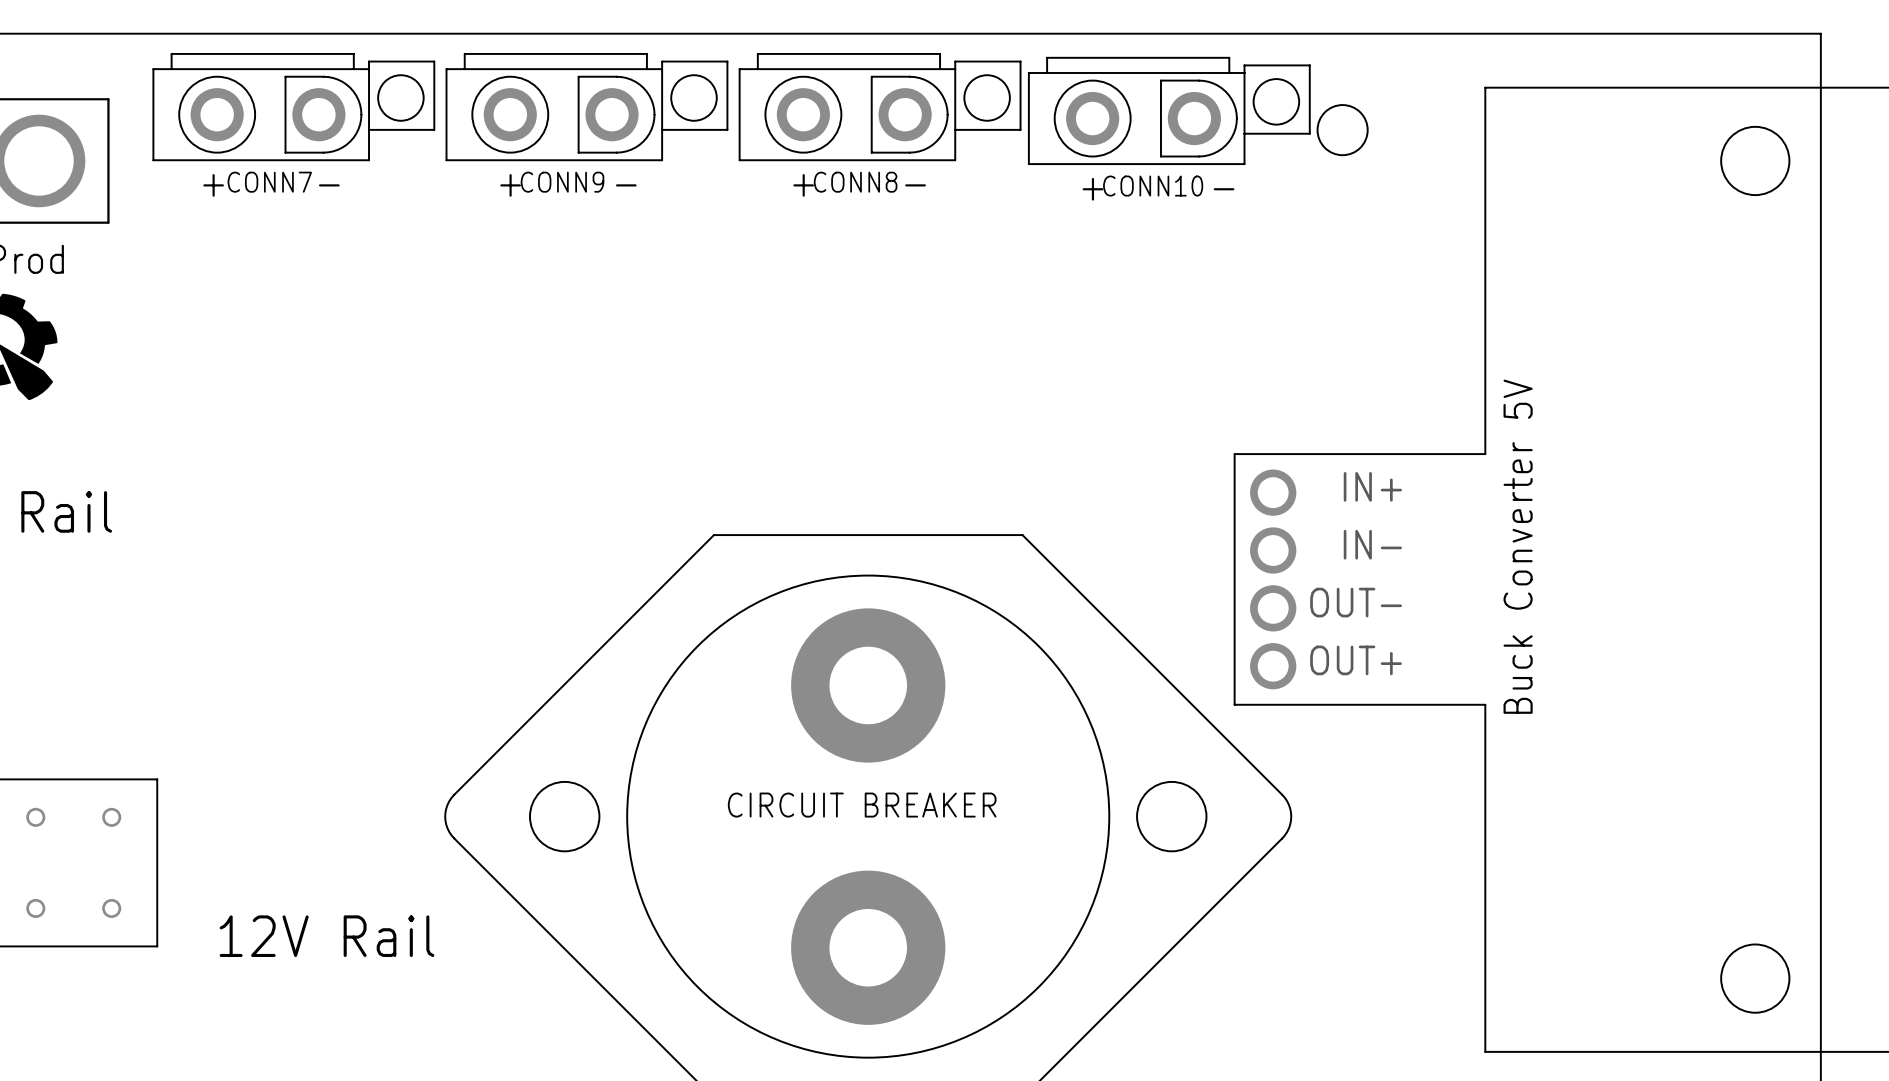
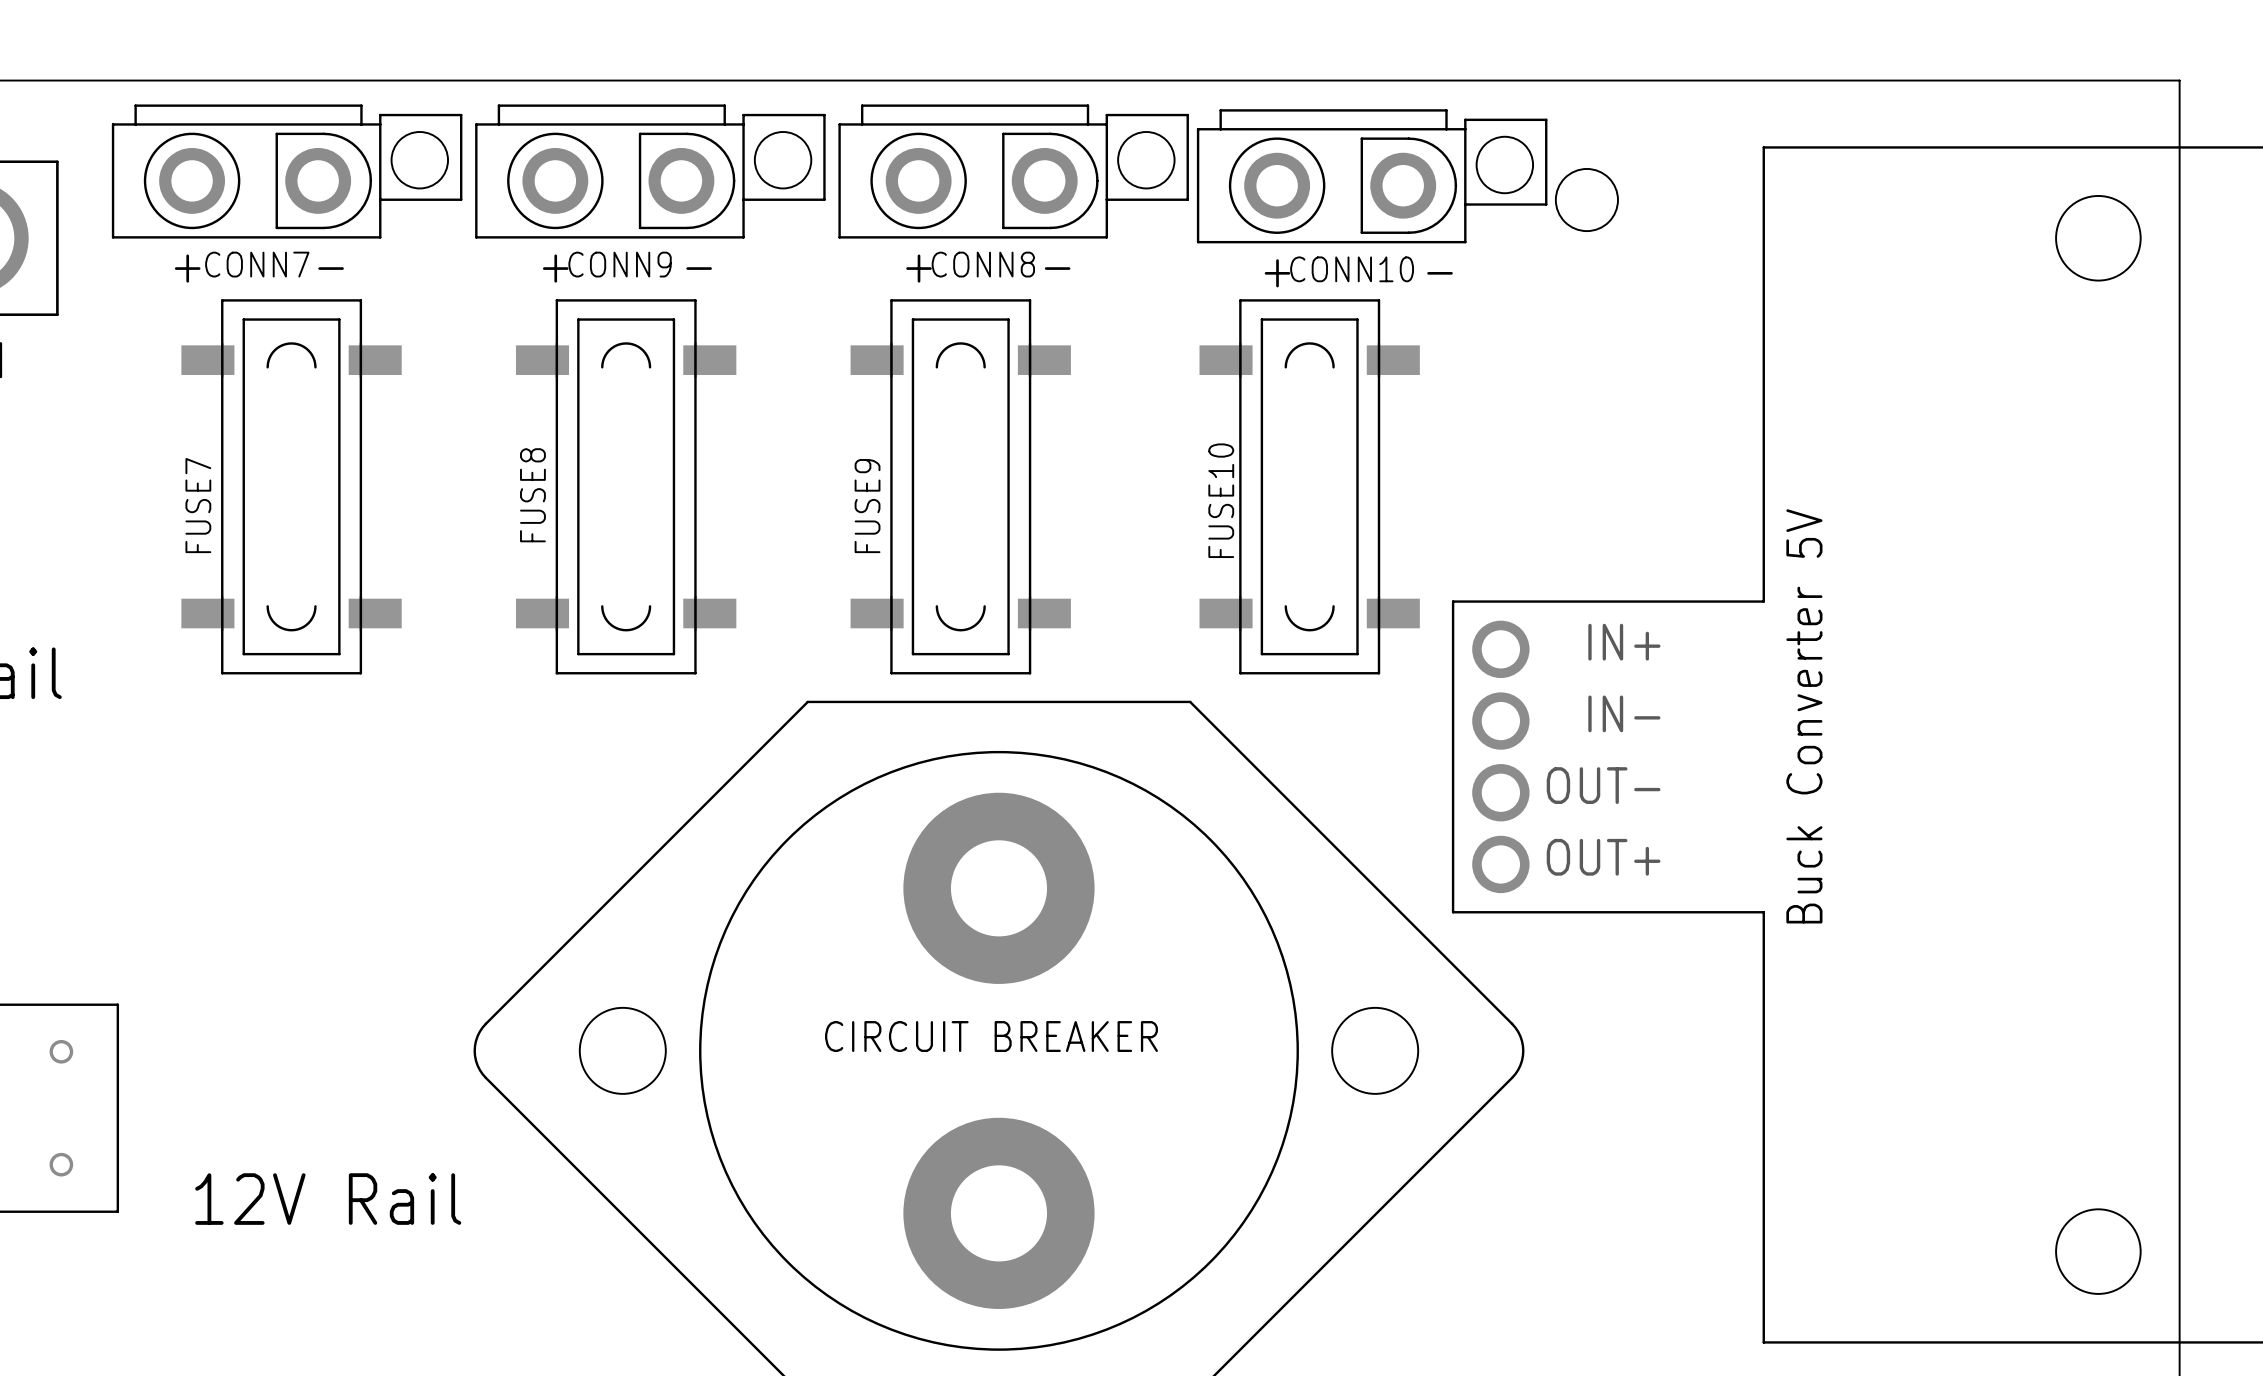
FUSE7: none -> (291, 486)
FUSE8: none -> (626, 486)
FUSE9: none -> (960, 486)
FUSE10: none -> (1309, 486)

